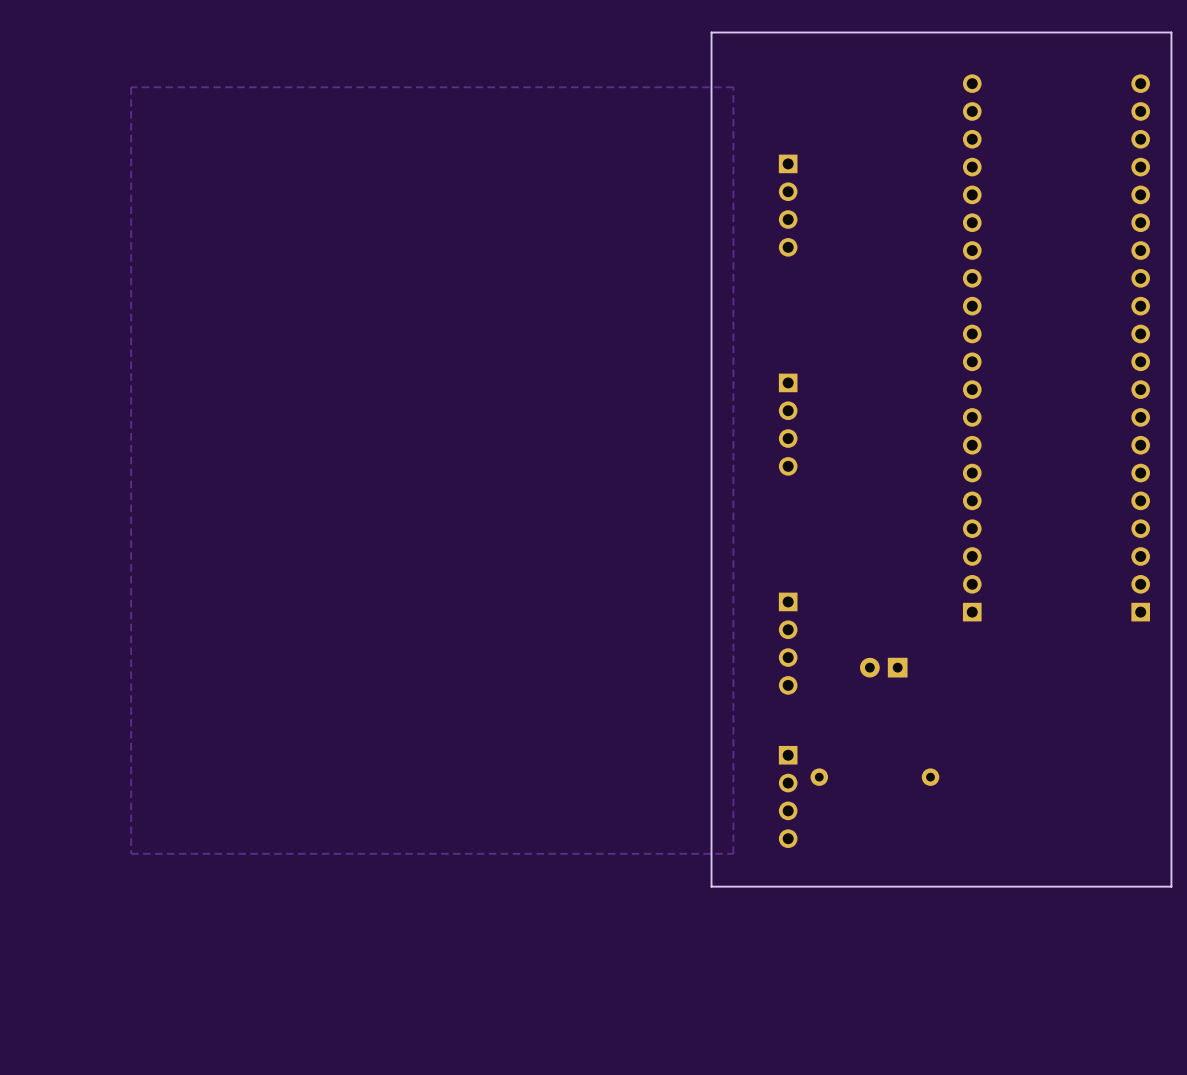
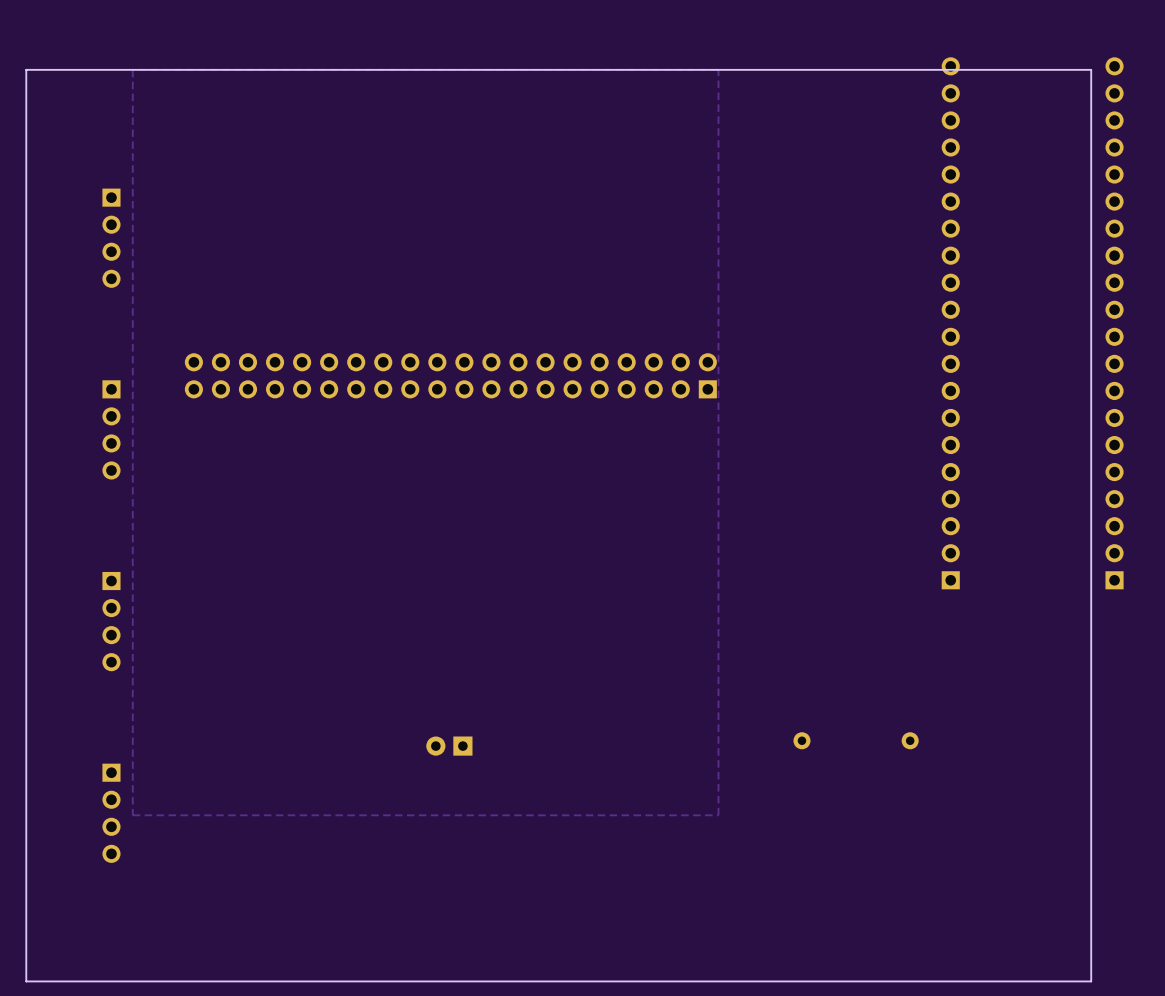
board edge: (1171, 32) (711, 32) (711, 886) (1171, 886) (1171, 32) -> none
board edge: none -> (1091, 69) (26, 69) (26, 981) (1091, 981) (1091, 69)
part: (788, 205) -> none
part: none -> (111, 238)
part: none -> (450, 375)
part: (788, 424) -> none
part: none -> (111, 429)
part: (788, 643) -> none
part: none -> (111, 621)
part: (883, 667) -> none
part: none -> (449, 746)
part: (788, 796) -> none
part: none -> (111, 813)

